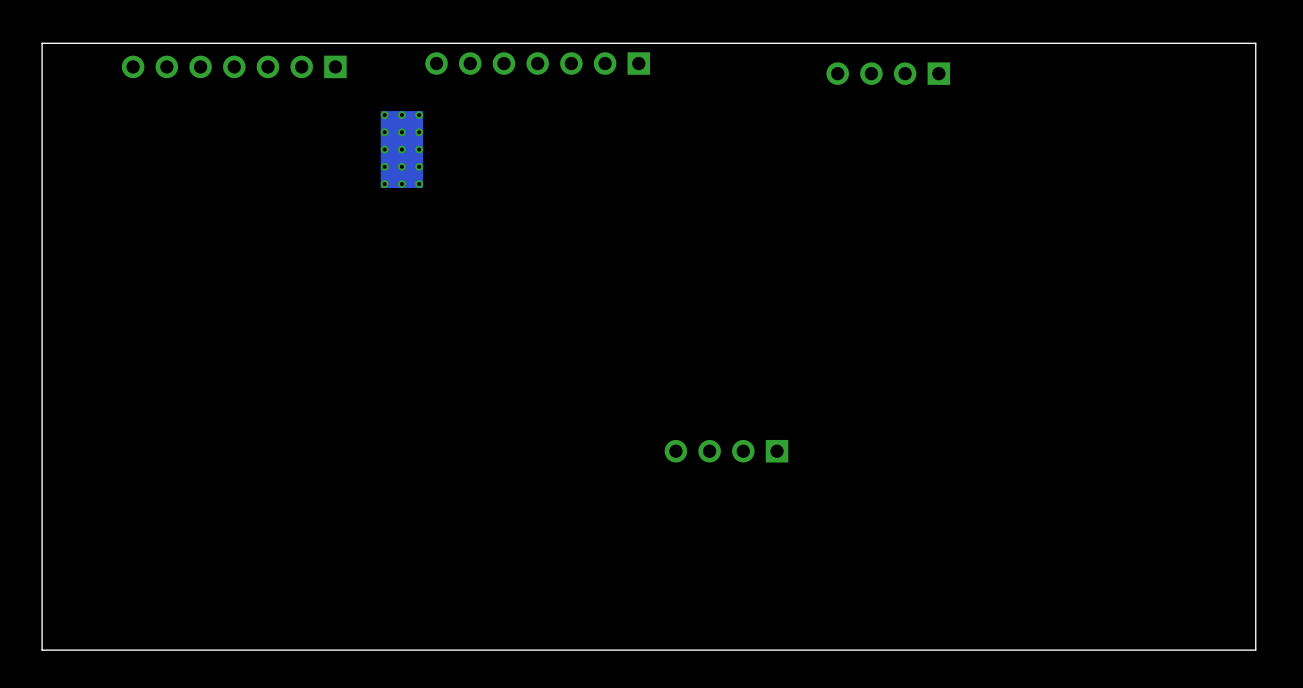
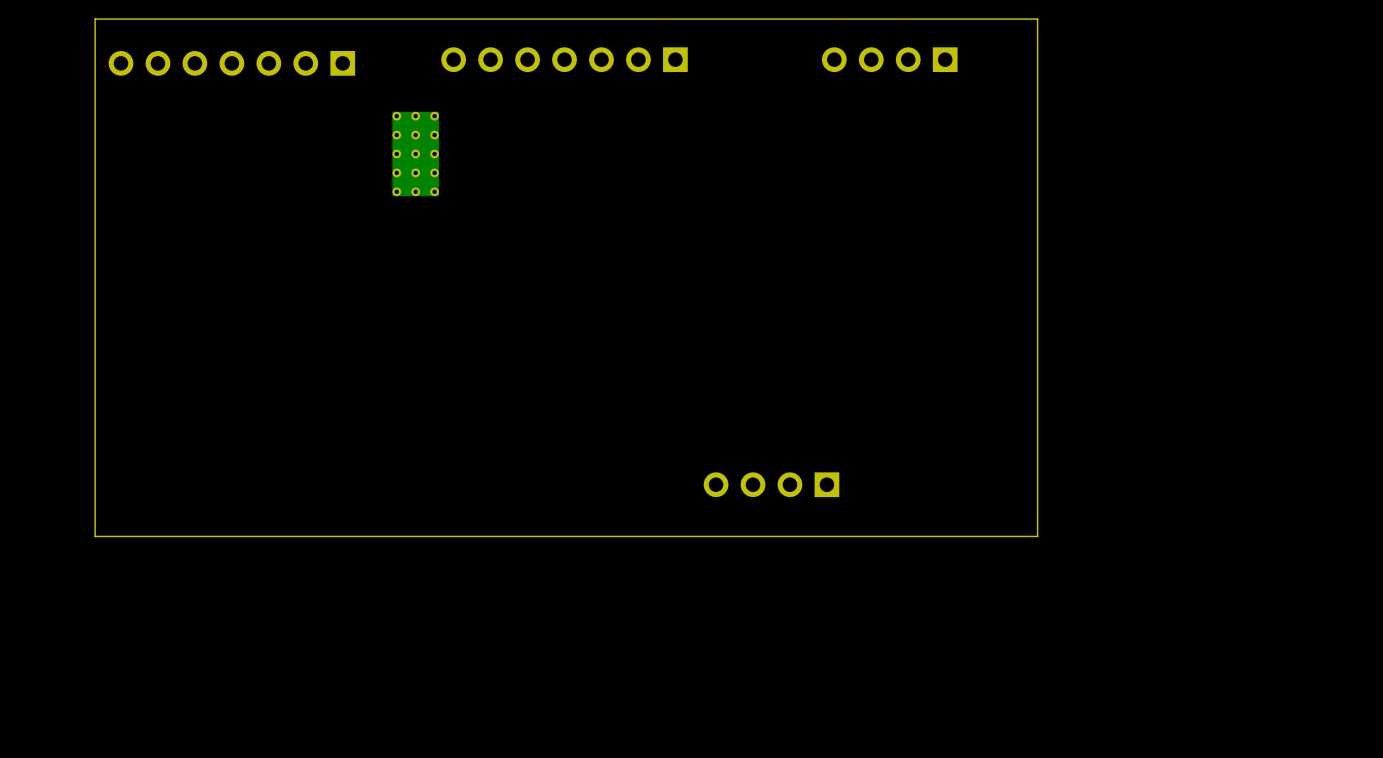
board edge: (1255, 43) (1255, 650) (42, 650) (42, 43) (1255, 43) -> (1037, 19) (1037, 536) (95, 536) (95, 19) (1037, 19)
part position: (888, 73) -> (889, 59)

